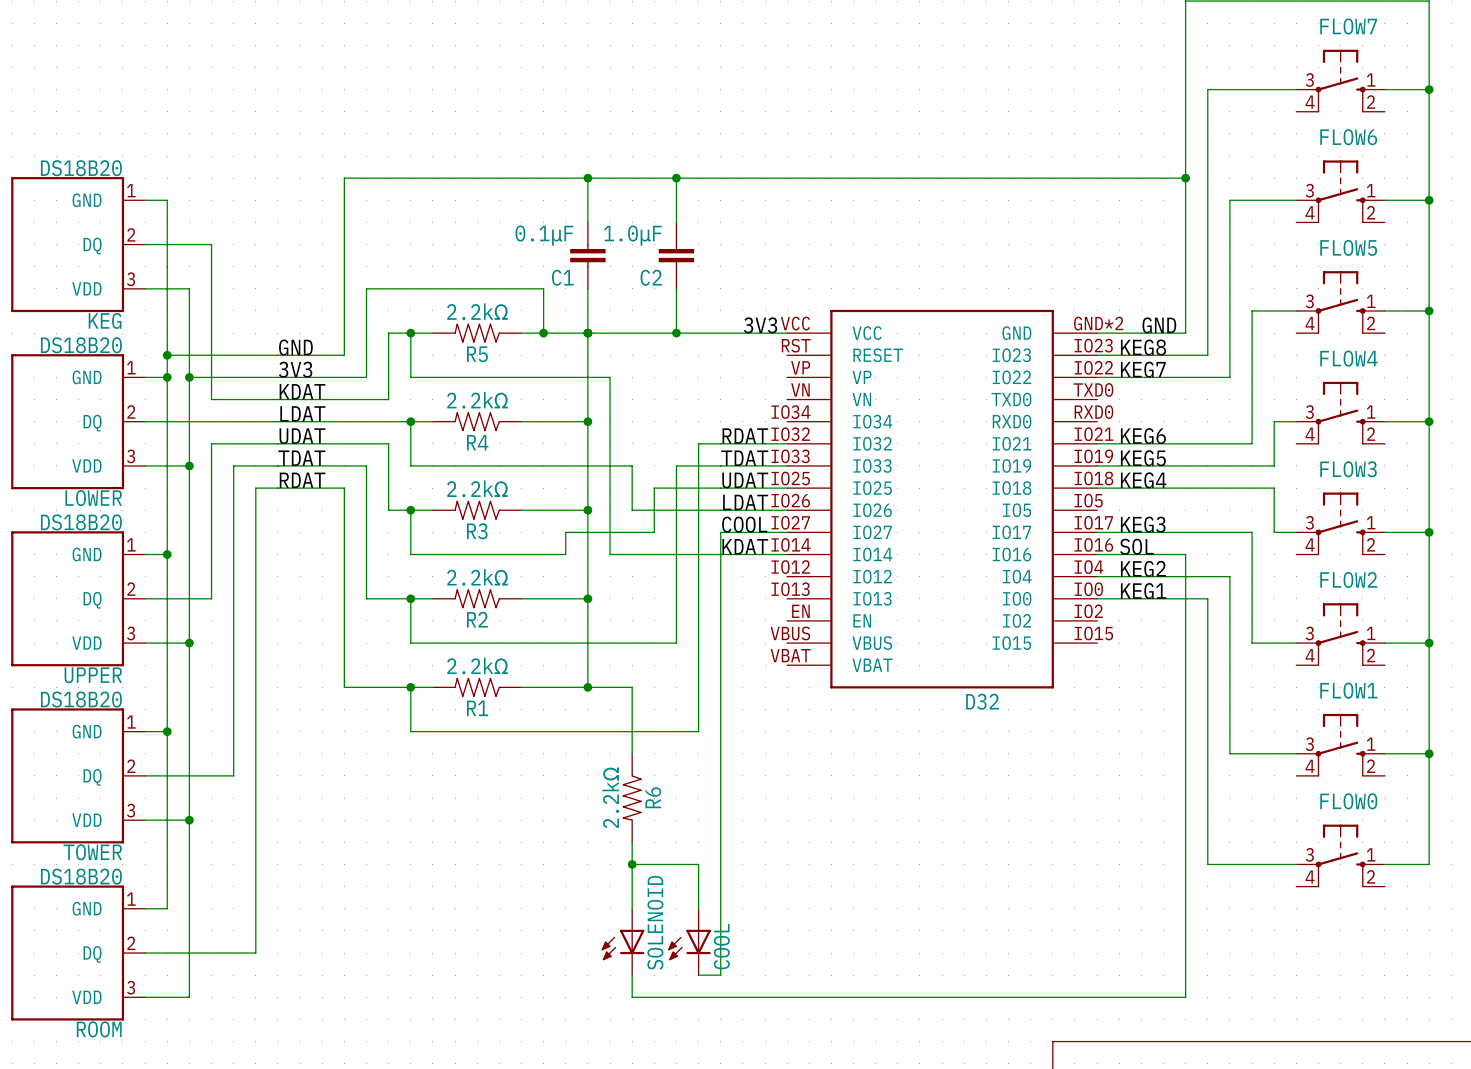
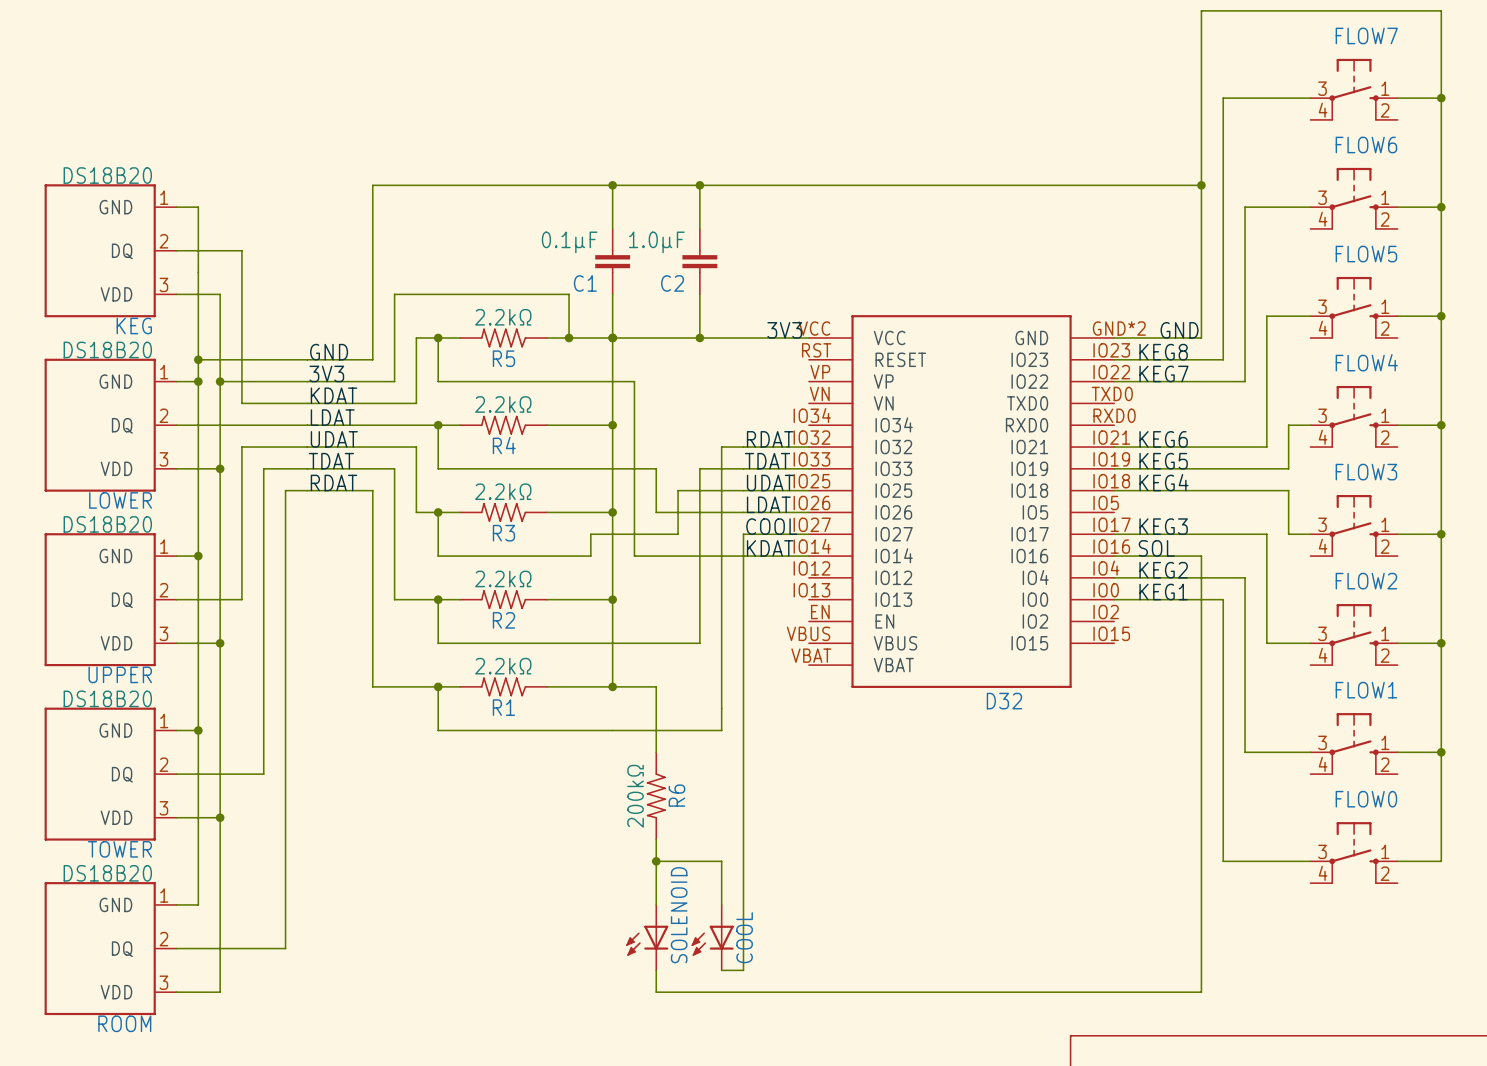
R6 value: 2.2kΩ (610, 797) -> 200kΩ (635, 796)

